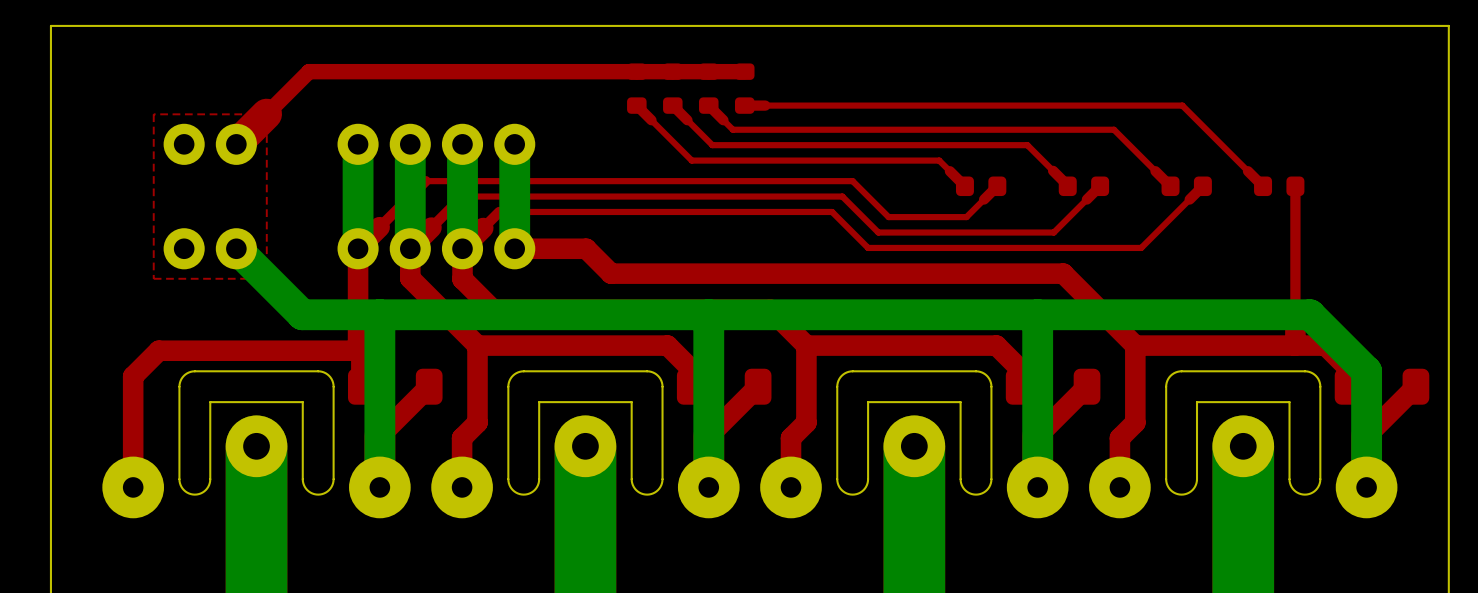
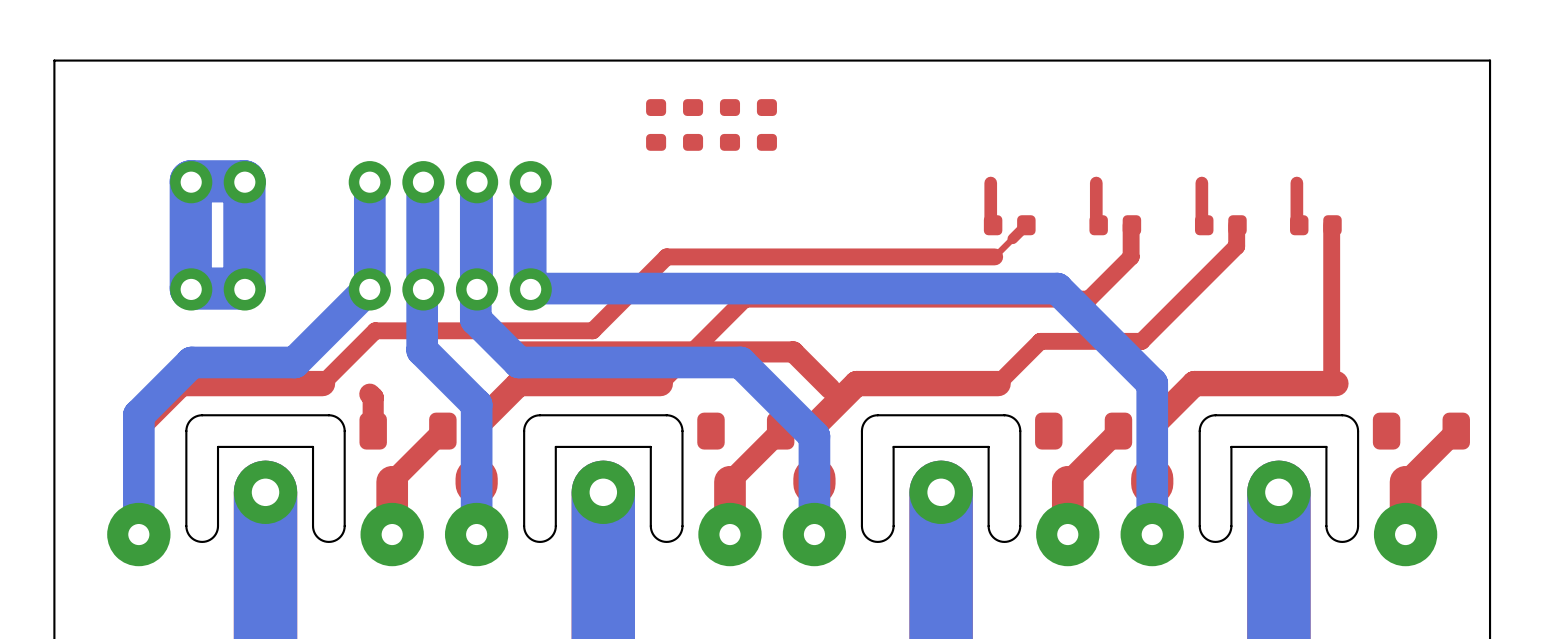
top track: (744, 71) (309, 71) (236, 144) -> none
top track: (636, 105) (691, 160) (939, 160) (964, 186) -> (990, 183) (990, 223) (992, 225)
top track: (672, 105) (712, 145) (1027, 145) (1067, 186) -> (1096, 183) (1096, 223) (1097, 225)
top track: (708, 105) (732, 129) (1114, 129) (1170, 186) -> (1201, 183) (1201, 223) (1203, 225)
top track: (744, 105) (1182, 105) (1263, 186) -> (1296, 183) (1296, 223) (1298, 225)
top zone outline: (266, 114) (153, 114) (153, 278) (266, 278) (266, 114) -> none
bottom track: none -> (244, 181) (190, 181) (190, 288) (244, 288) (244, 181)
bottom track: none -> (422, 181) (422, 350) (476, 404) (476, 531)
bottom track: none -> (475, 181) (475, 319) (518, 362) (740, 362) (814, 436) (814, 531)
bottom track: none -> (529, 181) (529, 288) (1057, 288) (1152, 383) (1152, 531)
top track: (1100, 186) (1053, 232) (878, 232) (842, 196) (462, 196) (410, 248) (410, 278) (477, 345) -> (1131, 225) (1131, 256) (1088, 299) (744, 299) (660, 383) (518, 383) (476, 425) (476, 483)
top track: (1202, 186) (1141, 247) (868, 247) (832, 211) (499, 211) (462, 248) (462, 279) (492, 309) -> none
top track: (1295, 186) (1294, 345) -> (1331, 225) (1331, 379) (1335, 383) (1194, 383) (1152, 425) (1152, 483)
top track: (888, 217) (852, 181) (425, 181) (358, 248) (358, 350) (158, 350) (133, 376) (133, 381) -> (914, 256) (666, 256) (592, 330) (375, 330) (322, 383) (181, 383) (138, 425)
top track width: thin (966, 217) (888, 217) -> thick (994, 256) (914, 256)
bottom track: none -> (368, 288) (294, 362) (191, 362) (138, 415) (138, 531)
bottom track: (236, 248) (302, 314) (1310, 314) (1366, 371) (1366, 487) -> none
top track: (514, 248) (586, 248) (611, 273) (1063, 273) (1135, 345) -> none
bottom track: (379, 314) (379, 487) -> none
bottom track: (708, 314) (708, 487) -> none
bottom track: (1037, 314) (1037, 487) -> none
top track: (477, 345) (667, 345) (690, 368) (690, 386) -> none
top track: (477, 345) (477, 422) (462, 438) -> none
top track: (1135, 345) (1325, 345) (1348, 368) (1348, 386) -> none
top track: (1135, 345) (1135, 422) (1119, 438) -> none
top track: (1019, 386) (1019, 368) (996, 345) (806, 345) (806, 422) (791, 438) -> (1236, 225) (1236, 246) (1141, 341) (1040, 341) (998, 383) (856, 383) (814, 425) (814, 483)

